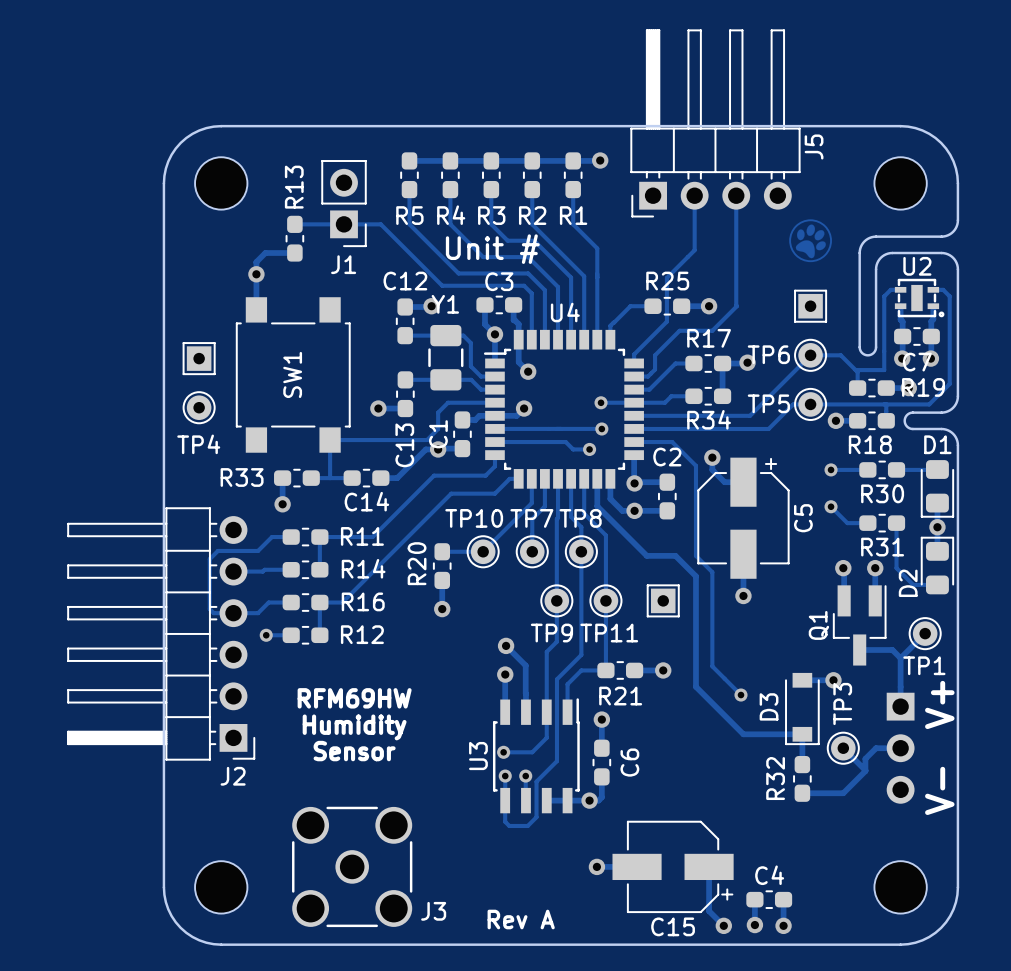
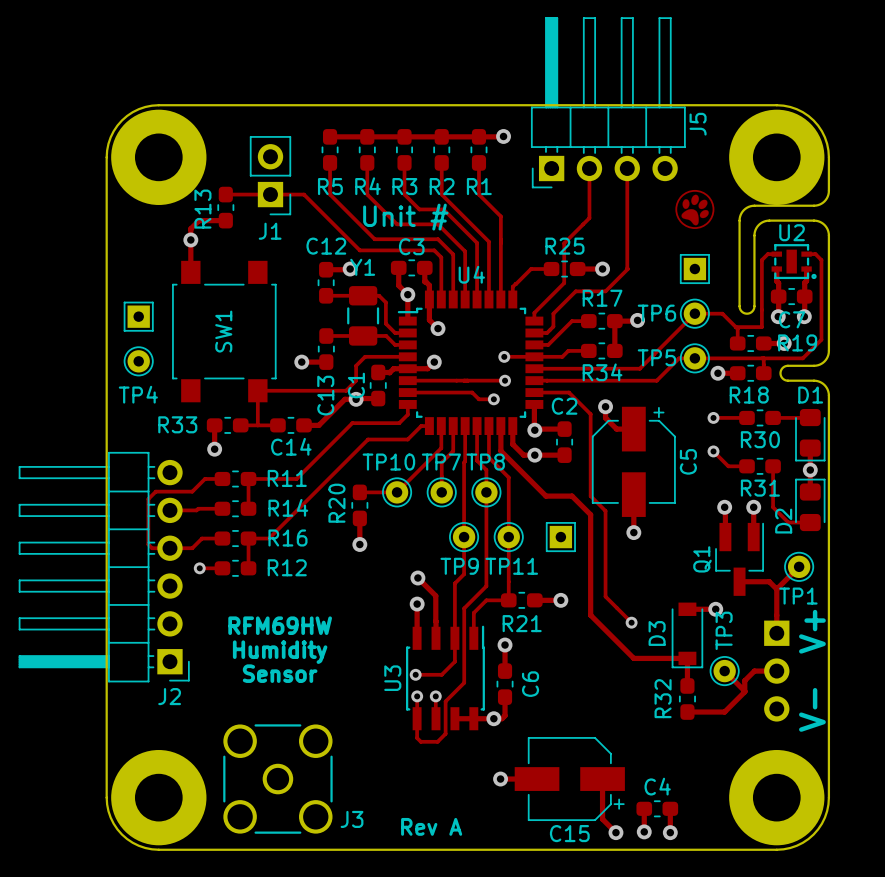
part footprint: [195, 157, 248, 210] -> [111, 109, 207, 205]
part footprint: [874, 157, 927, 210] -> [729, 109, 825, 205]
R13 name position: R13 (294, 187) -> R13 (202, 209)
part footprint: [195, 861, 248, 914] -> [111, 750, 207, 846]
part footprint: [874, 861, 927, 914] -> [729, 750, 825, 846]

